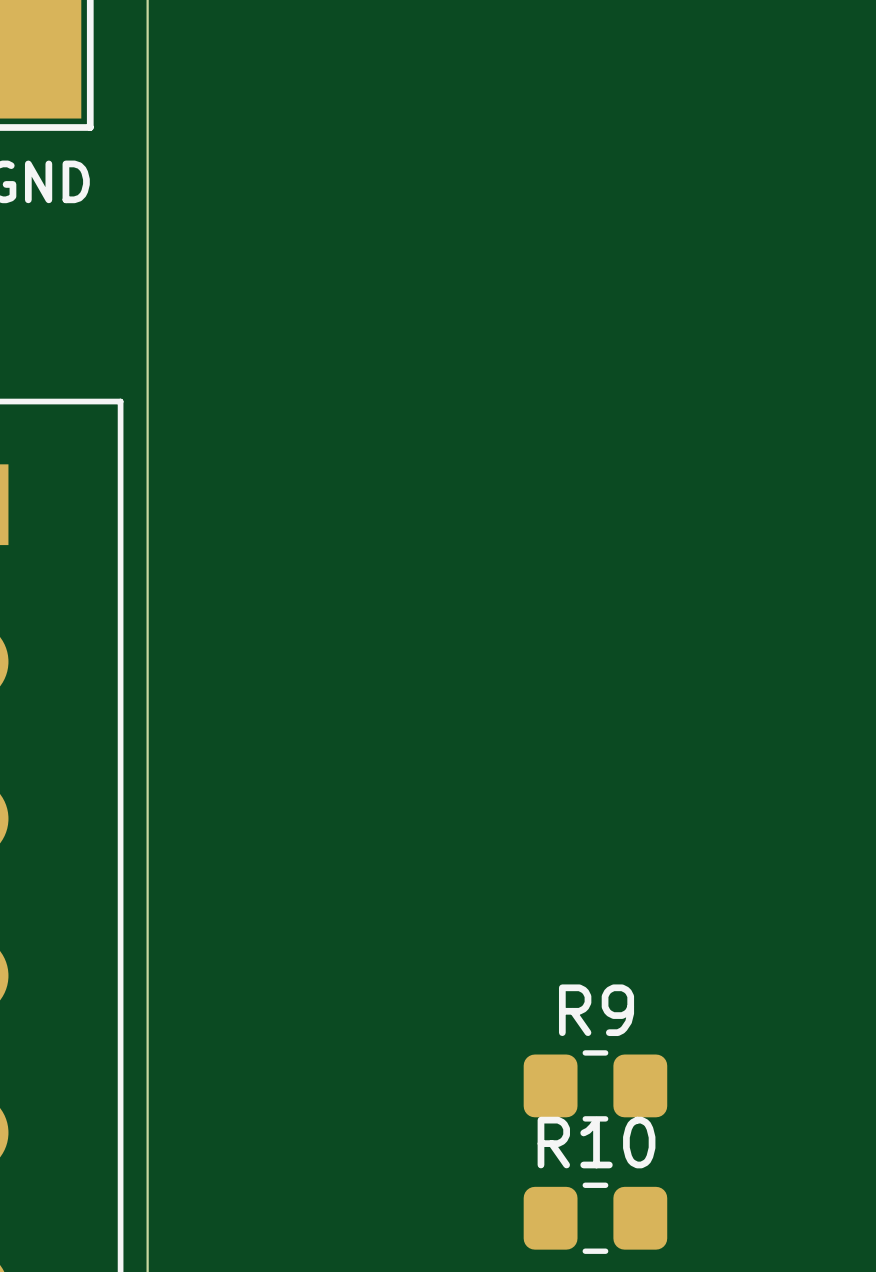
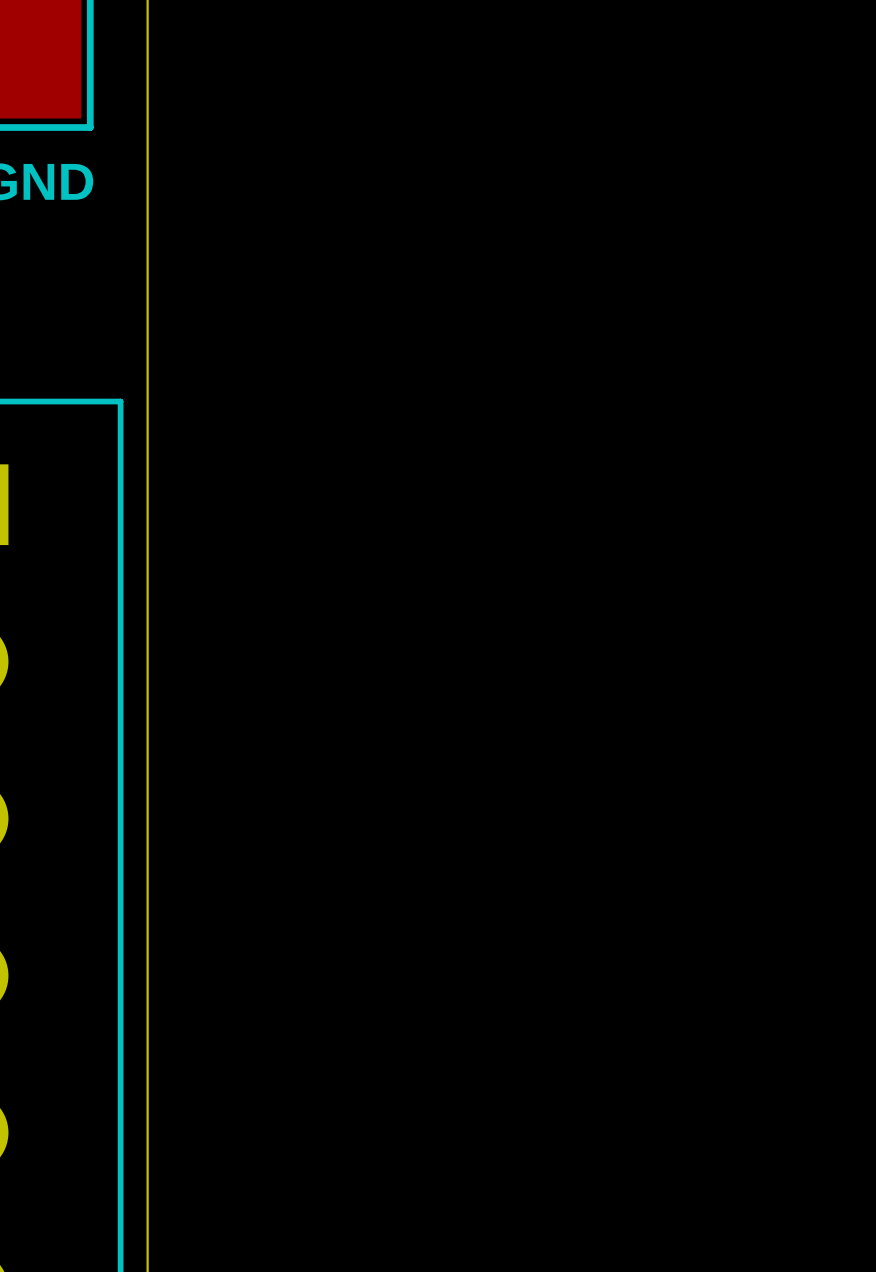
R9: (595, 1085) -> none
R10: (595, 1218) -> none

